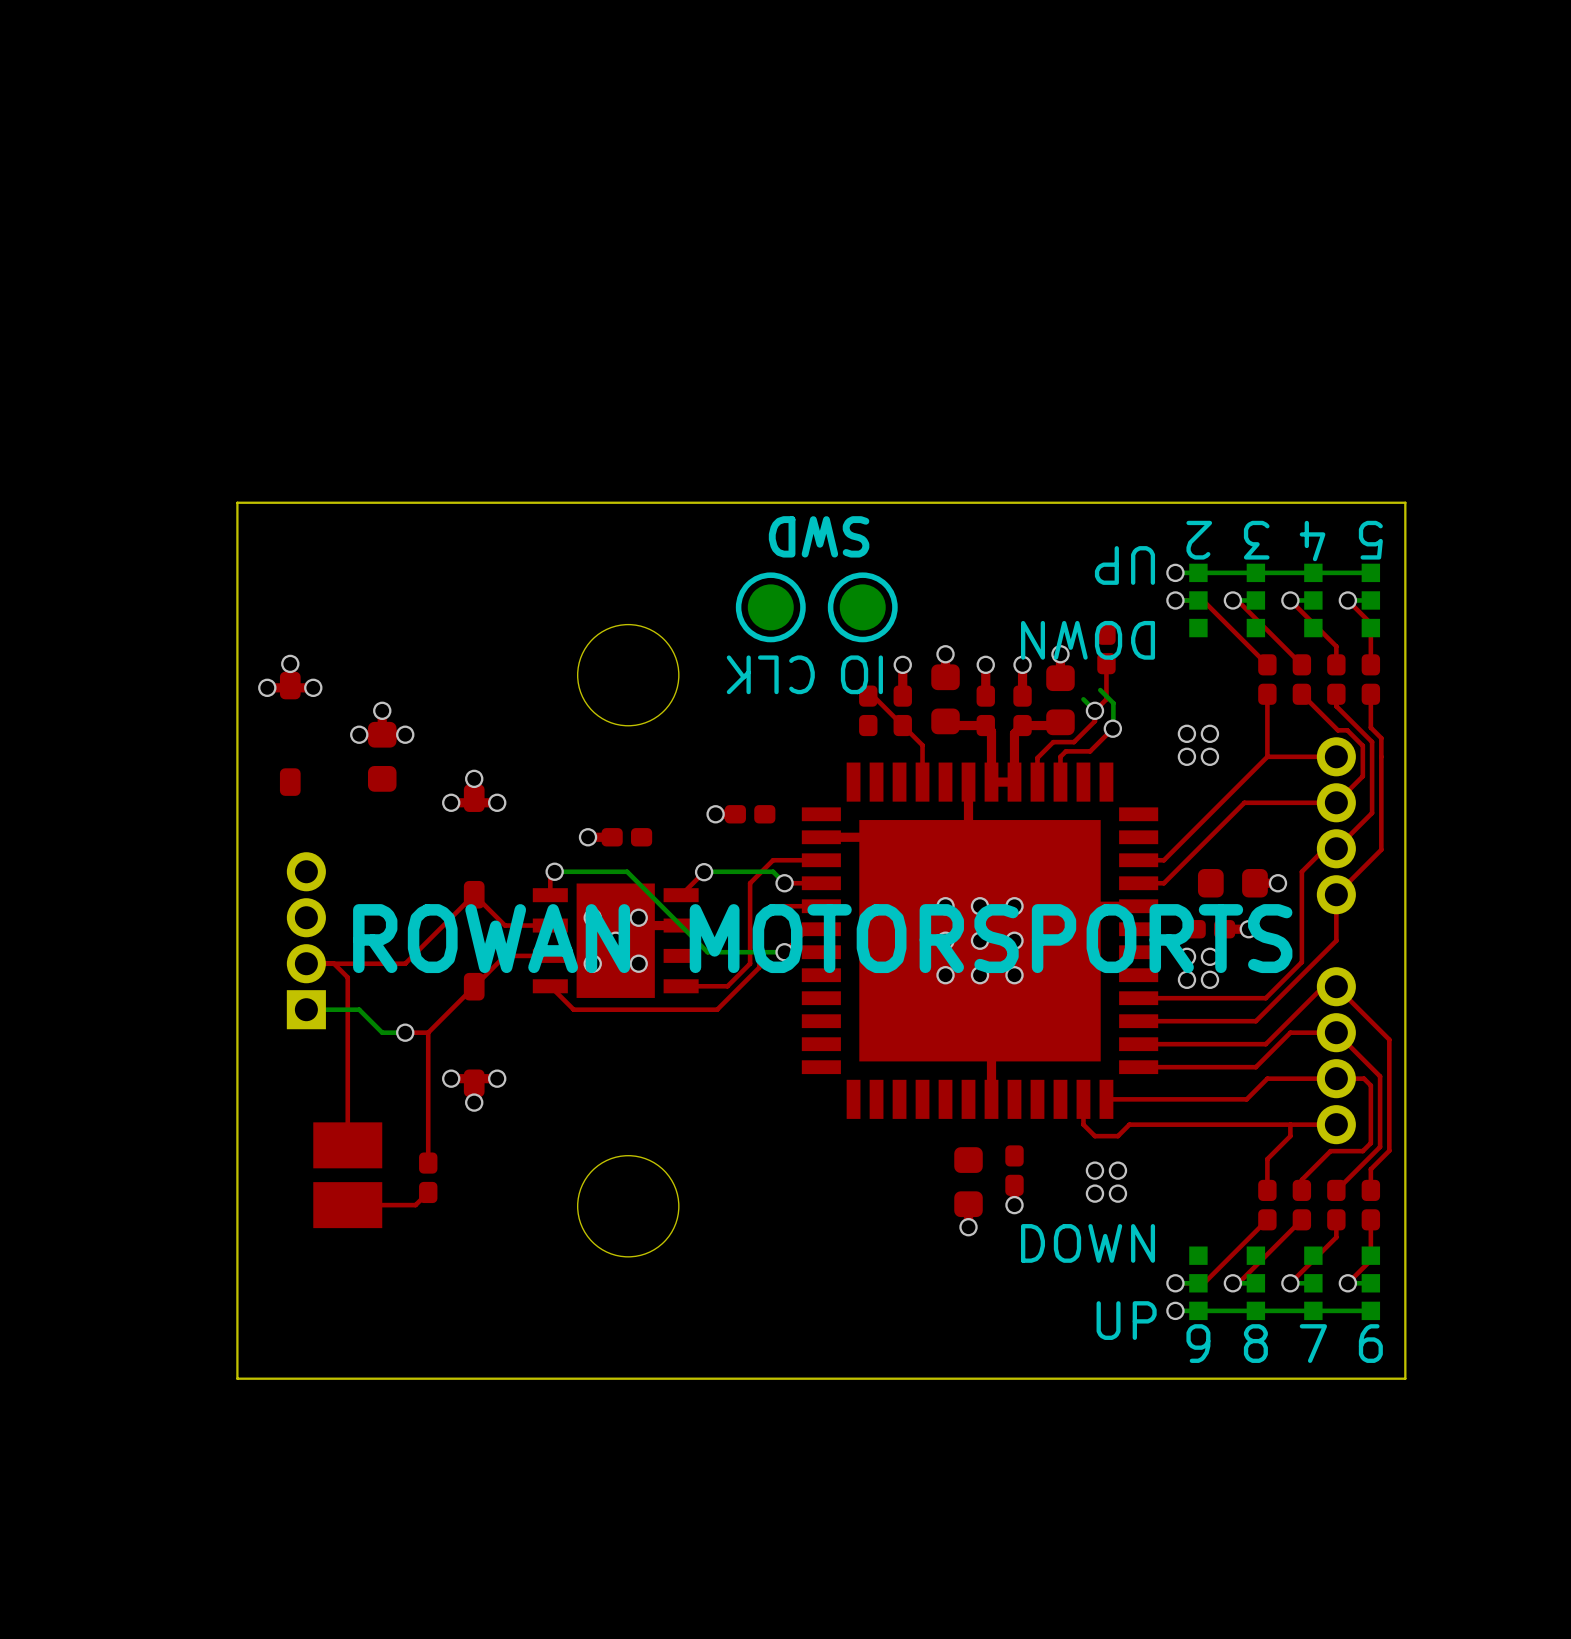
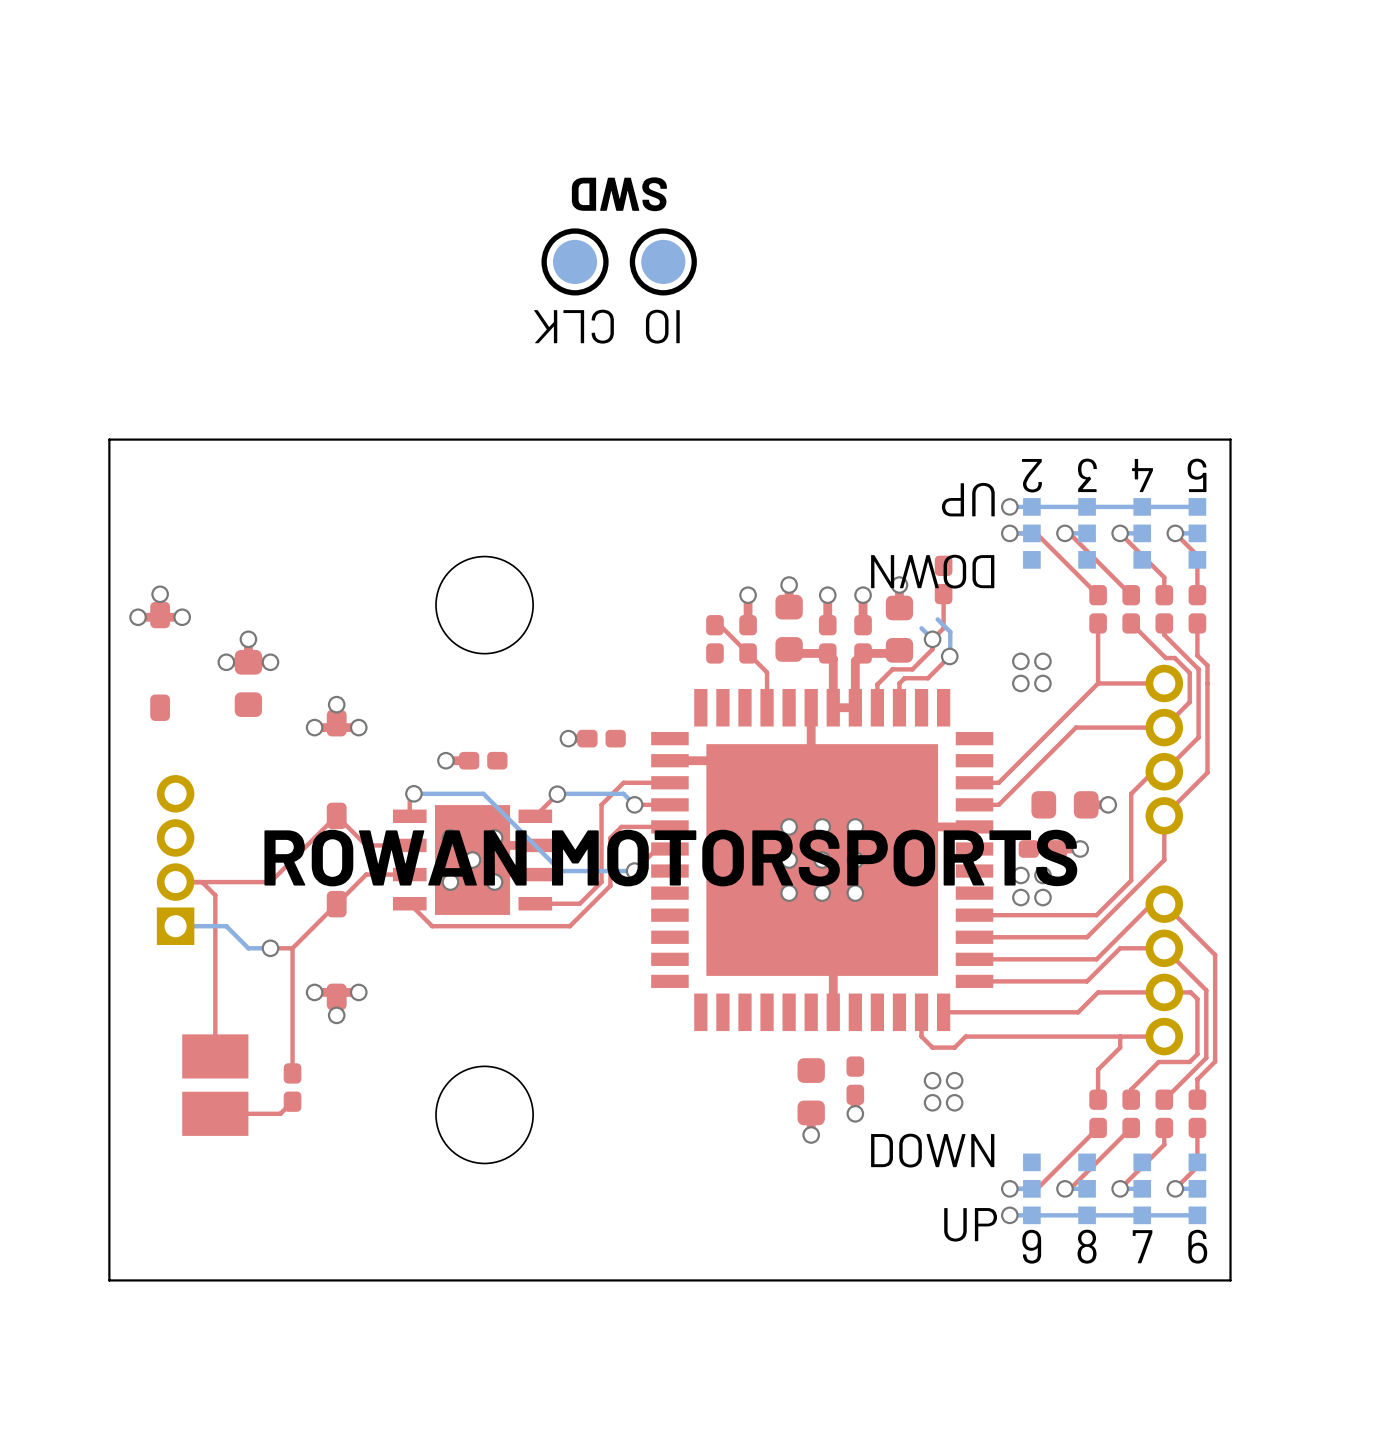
part: none -> (575, 261)
part: none -> (663, 261)
text position: SWD (819, 536) -> SWD (619, 194)
part: (770, 607) -> none
part: (862, 607) -> none
text position: CLK (770, 674) -> CLK (573, 326)
text position: IO (861, 674) -> IO (662, 326)

